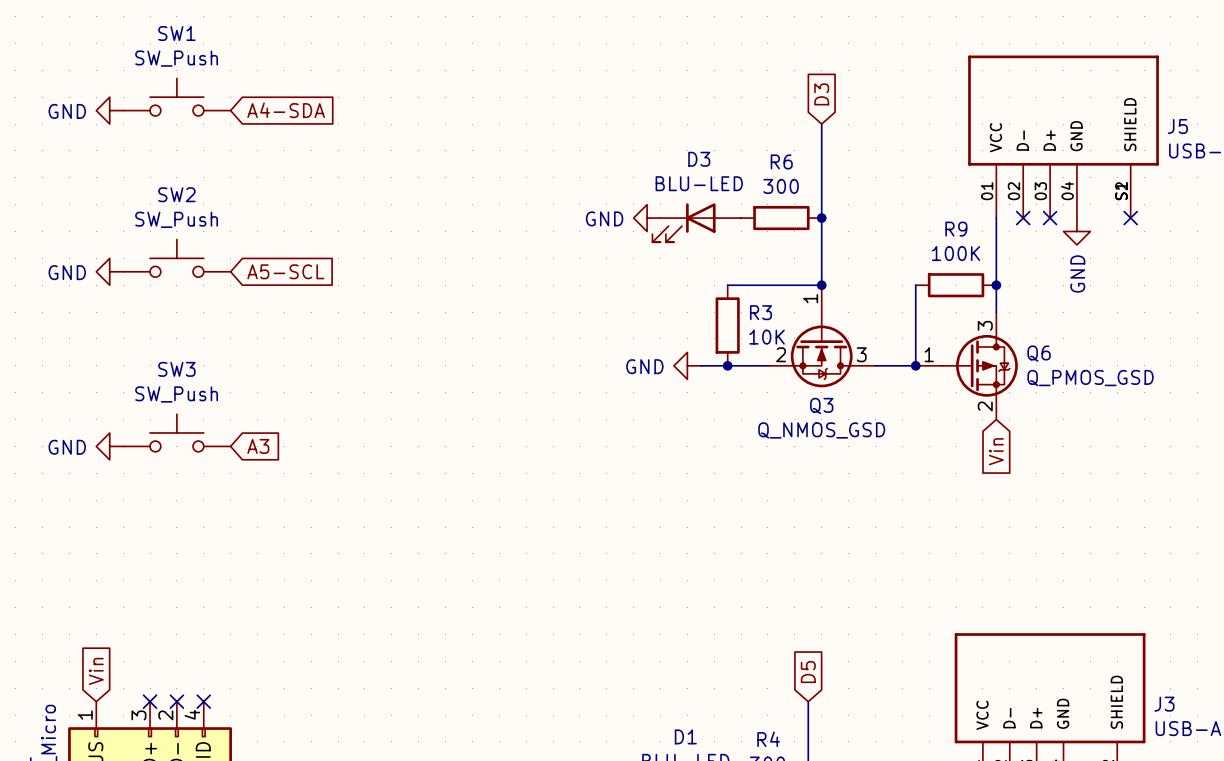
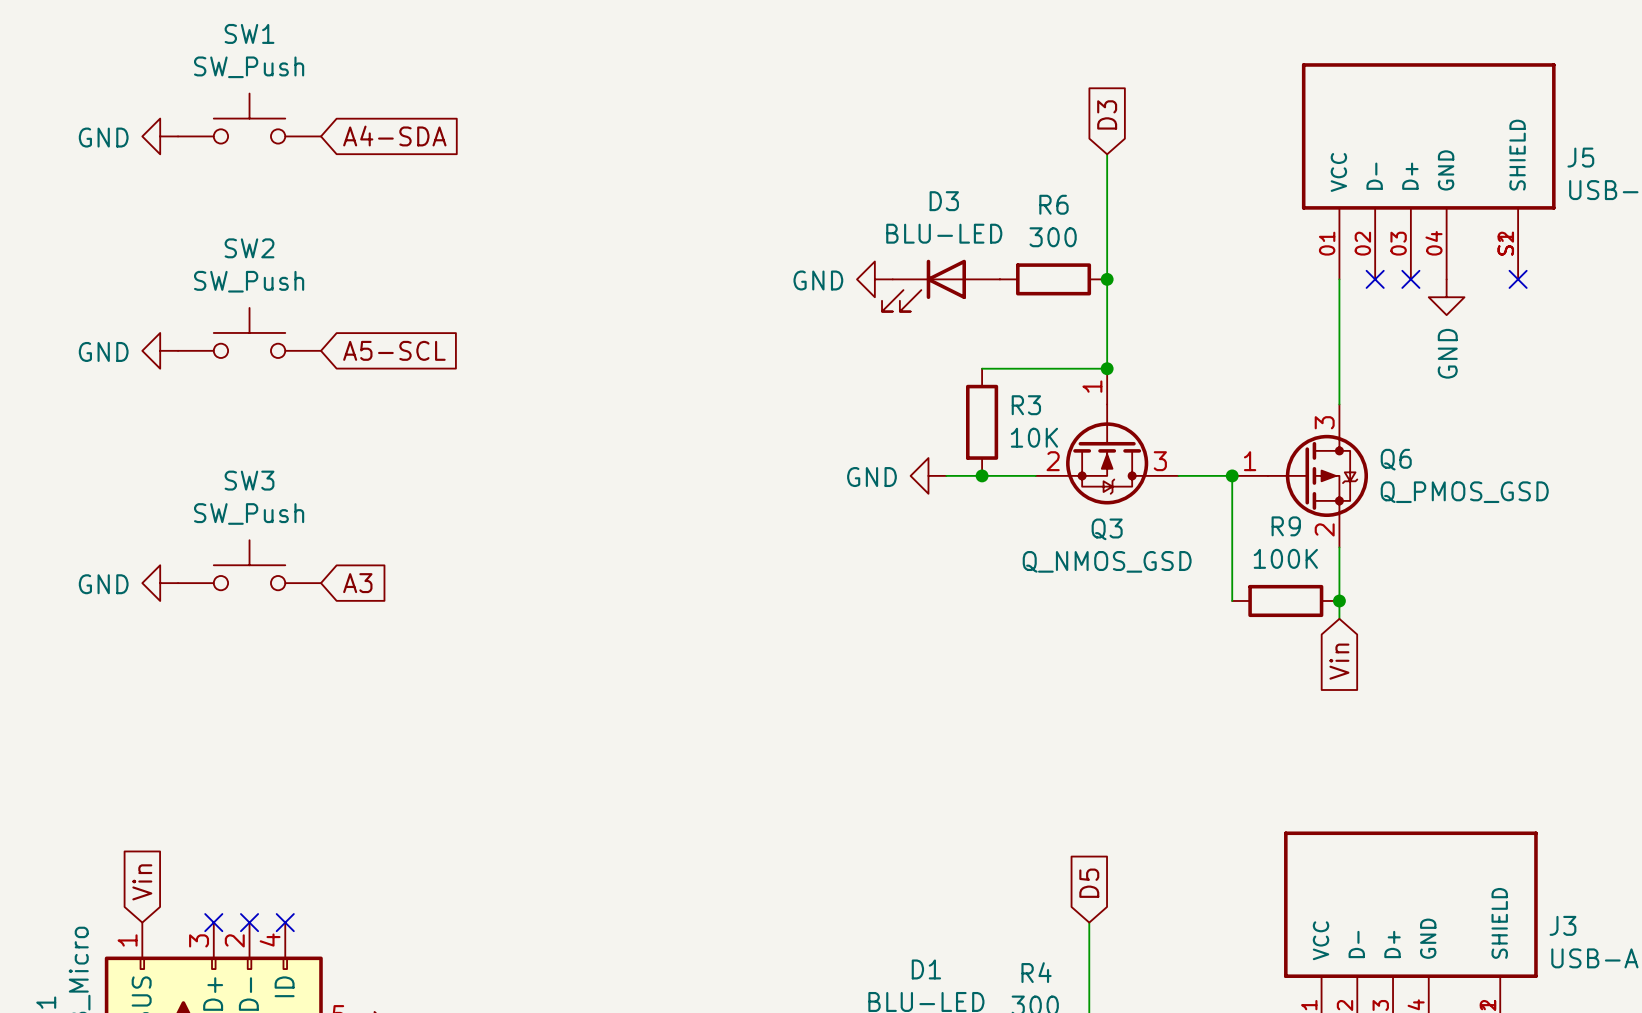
wire: (915, 285) (915, 365) -> (1232, 600) (1232, 475)
R9 position: (956, 285) -> (1285, 600)
junction: (996, 285) -> none
wire: none -> (1339, 547) (1339, 618)
global label position: Vin (996, 451) -> Vin (1339, 661)
junction: none -> (1339, 600)

